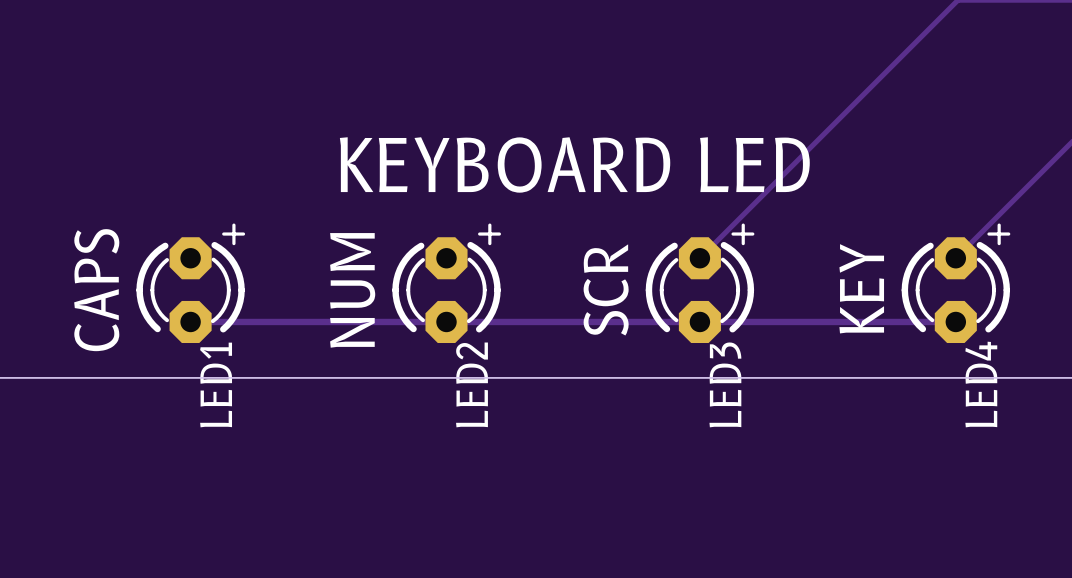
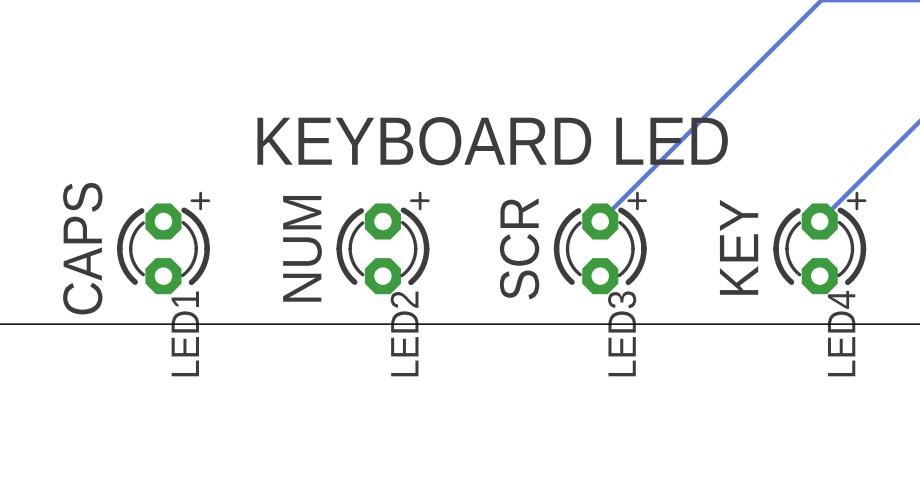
track: (955, 321) (190, 321) -> none

